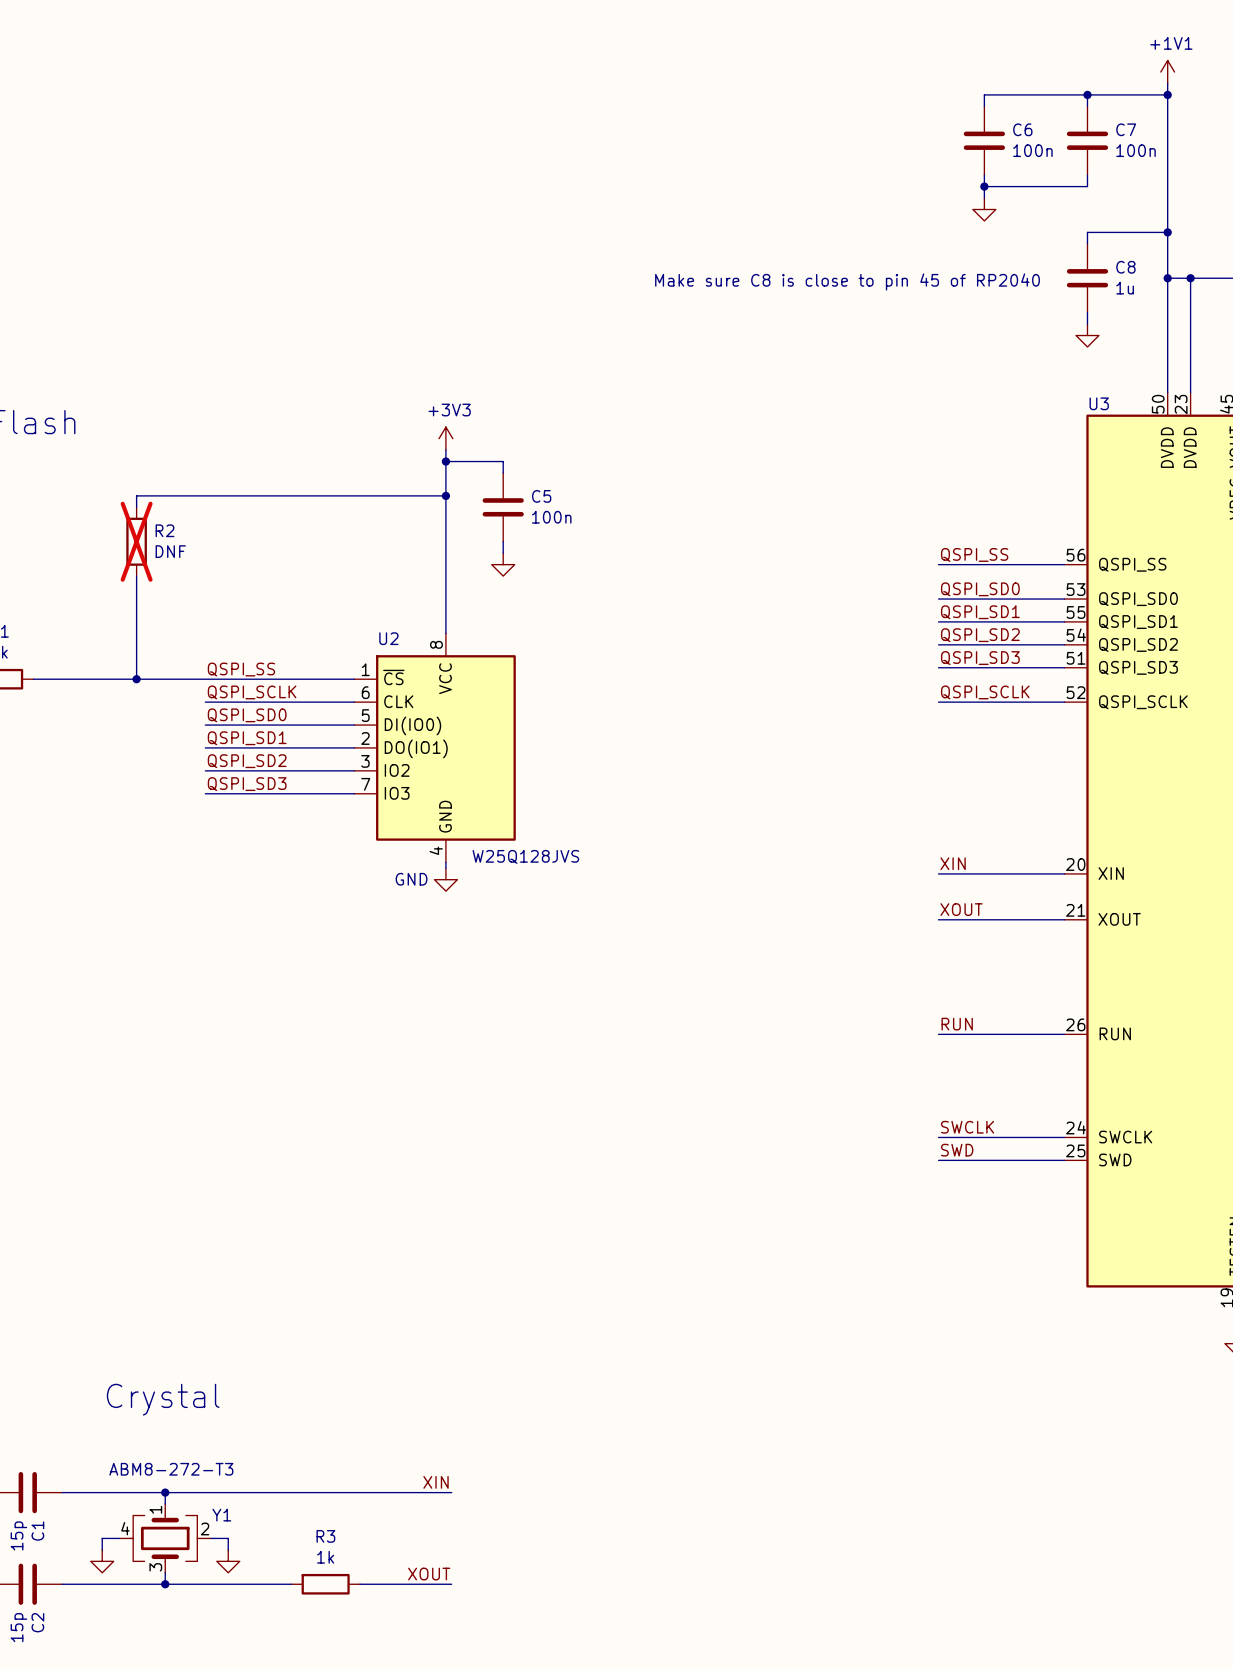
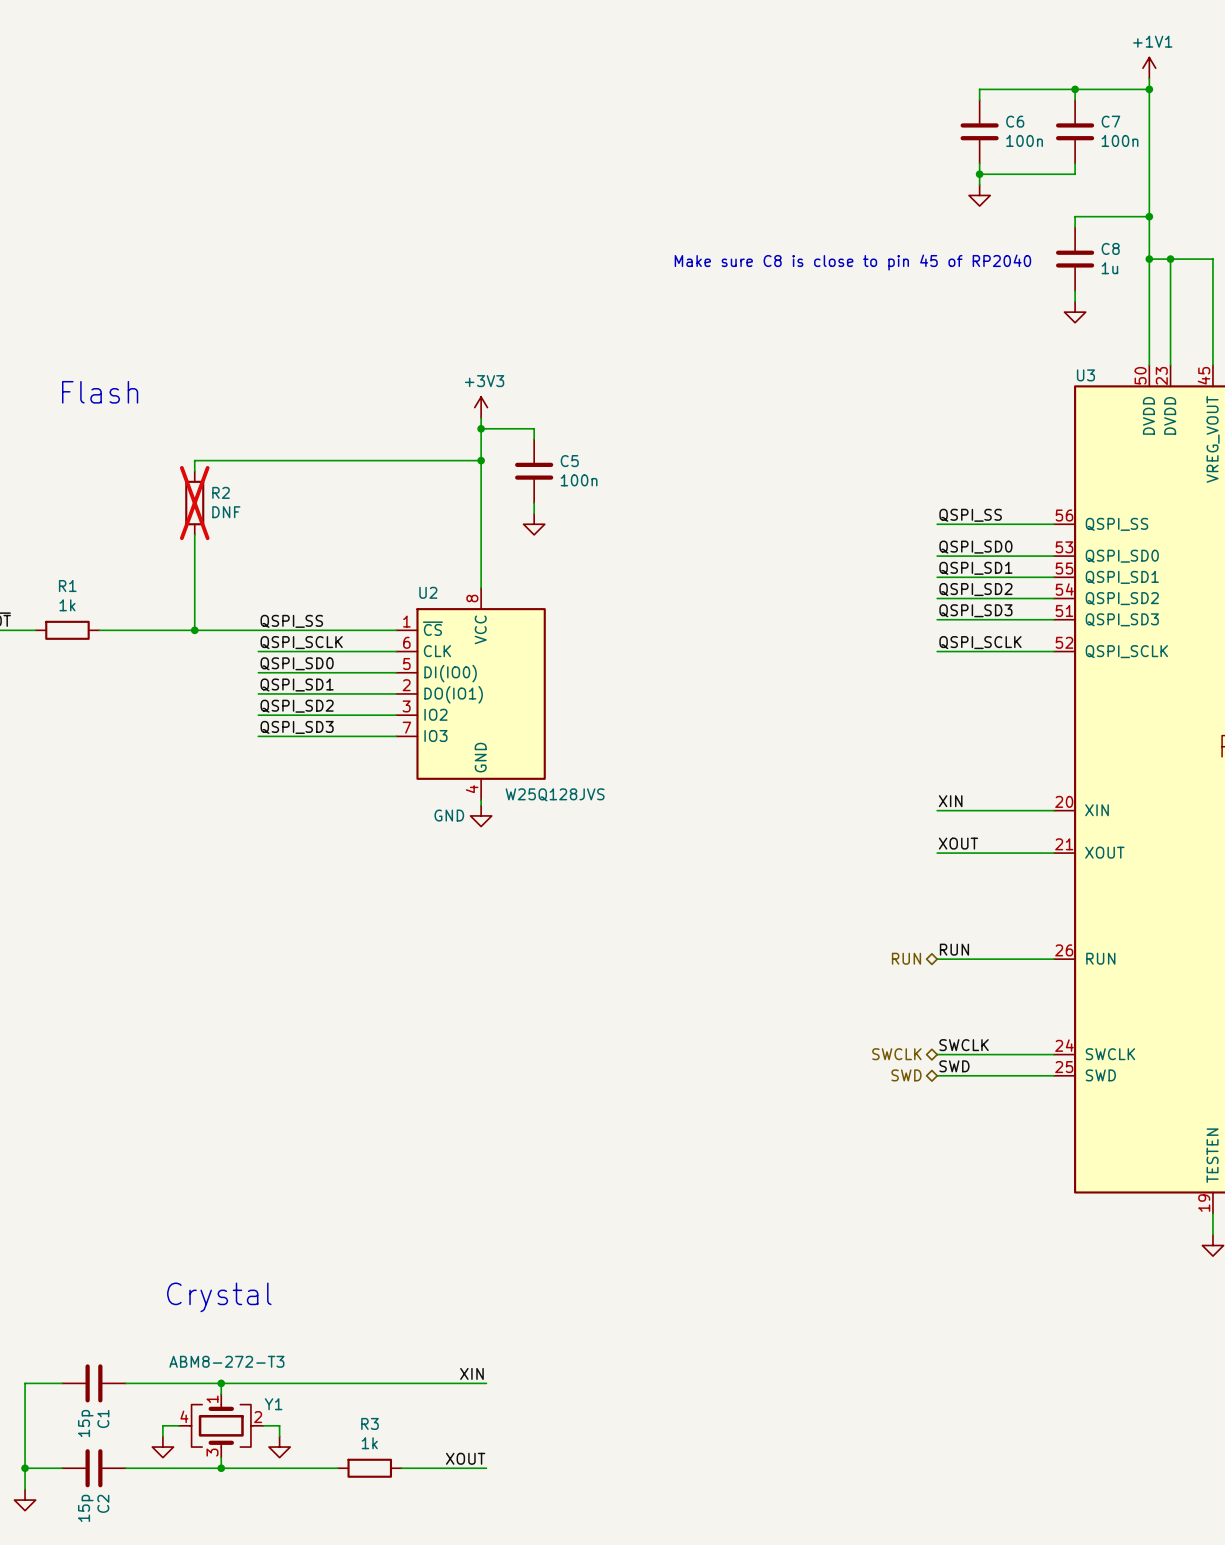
hierarchical label: none -> RUN (906, 958)
hierarchical label: none -> SWCLK (896, 1054)
hierarchical label: none -> SWD (906, 1075)

